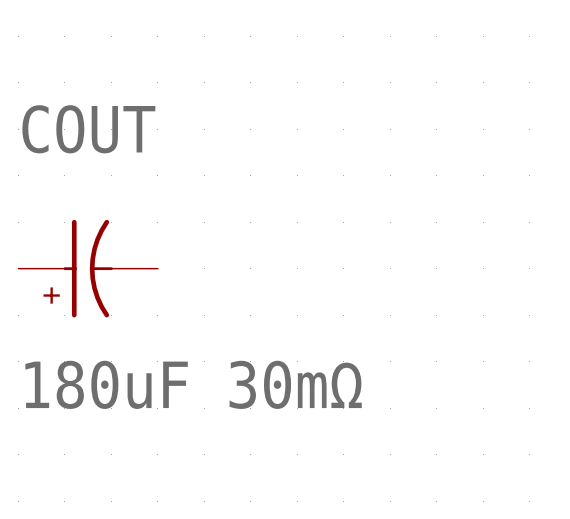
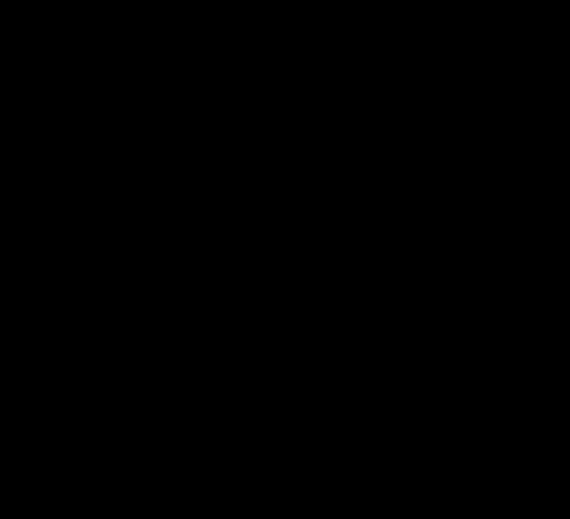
COUT: 180uF 30mΩ (88, 268) -> none

